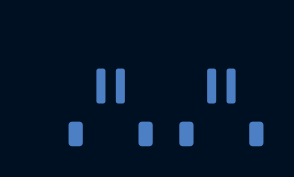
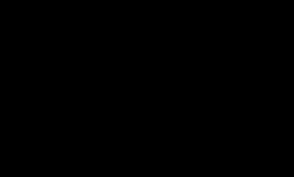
part: (110, 107) -> none
part: (221, 107) -> none

